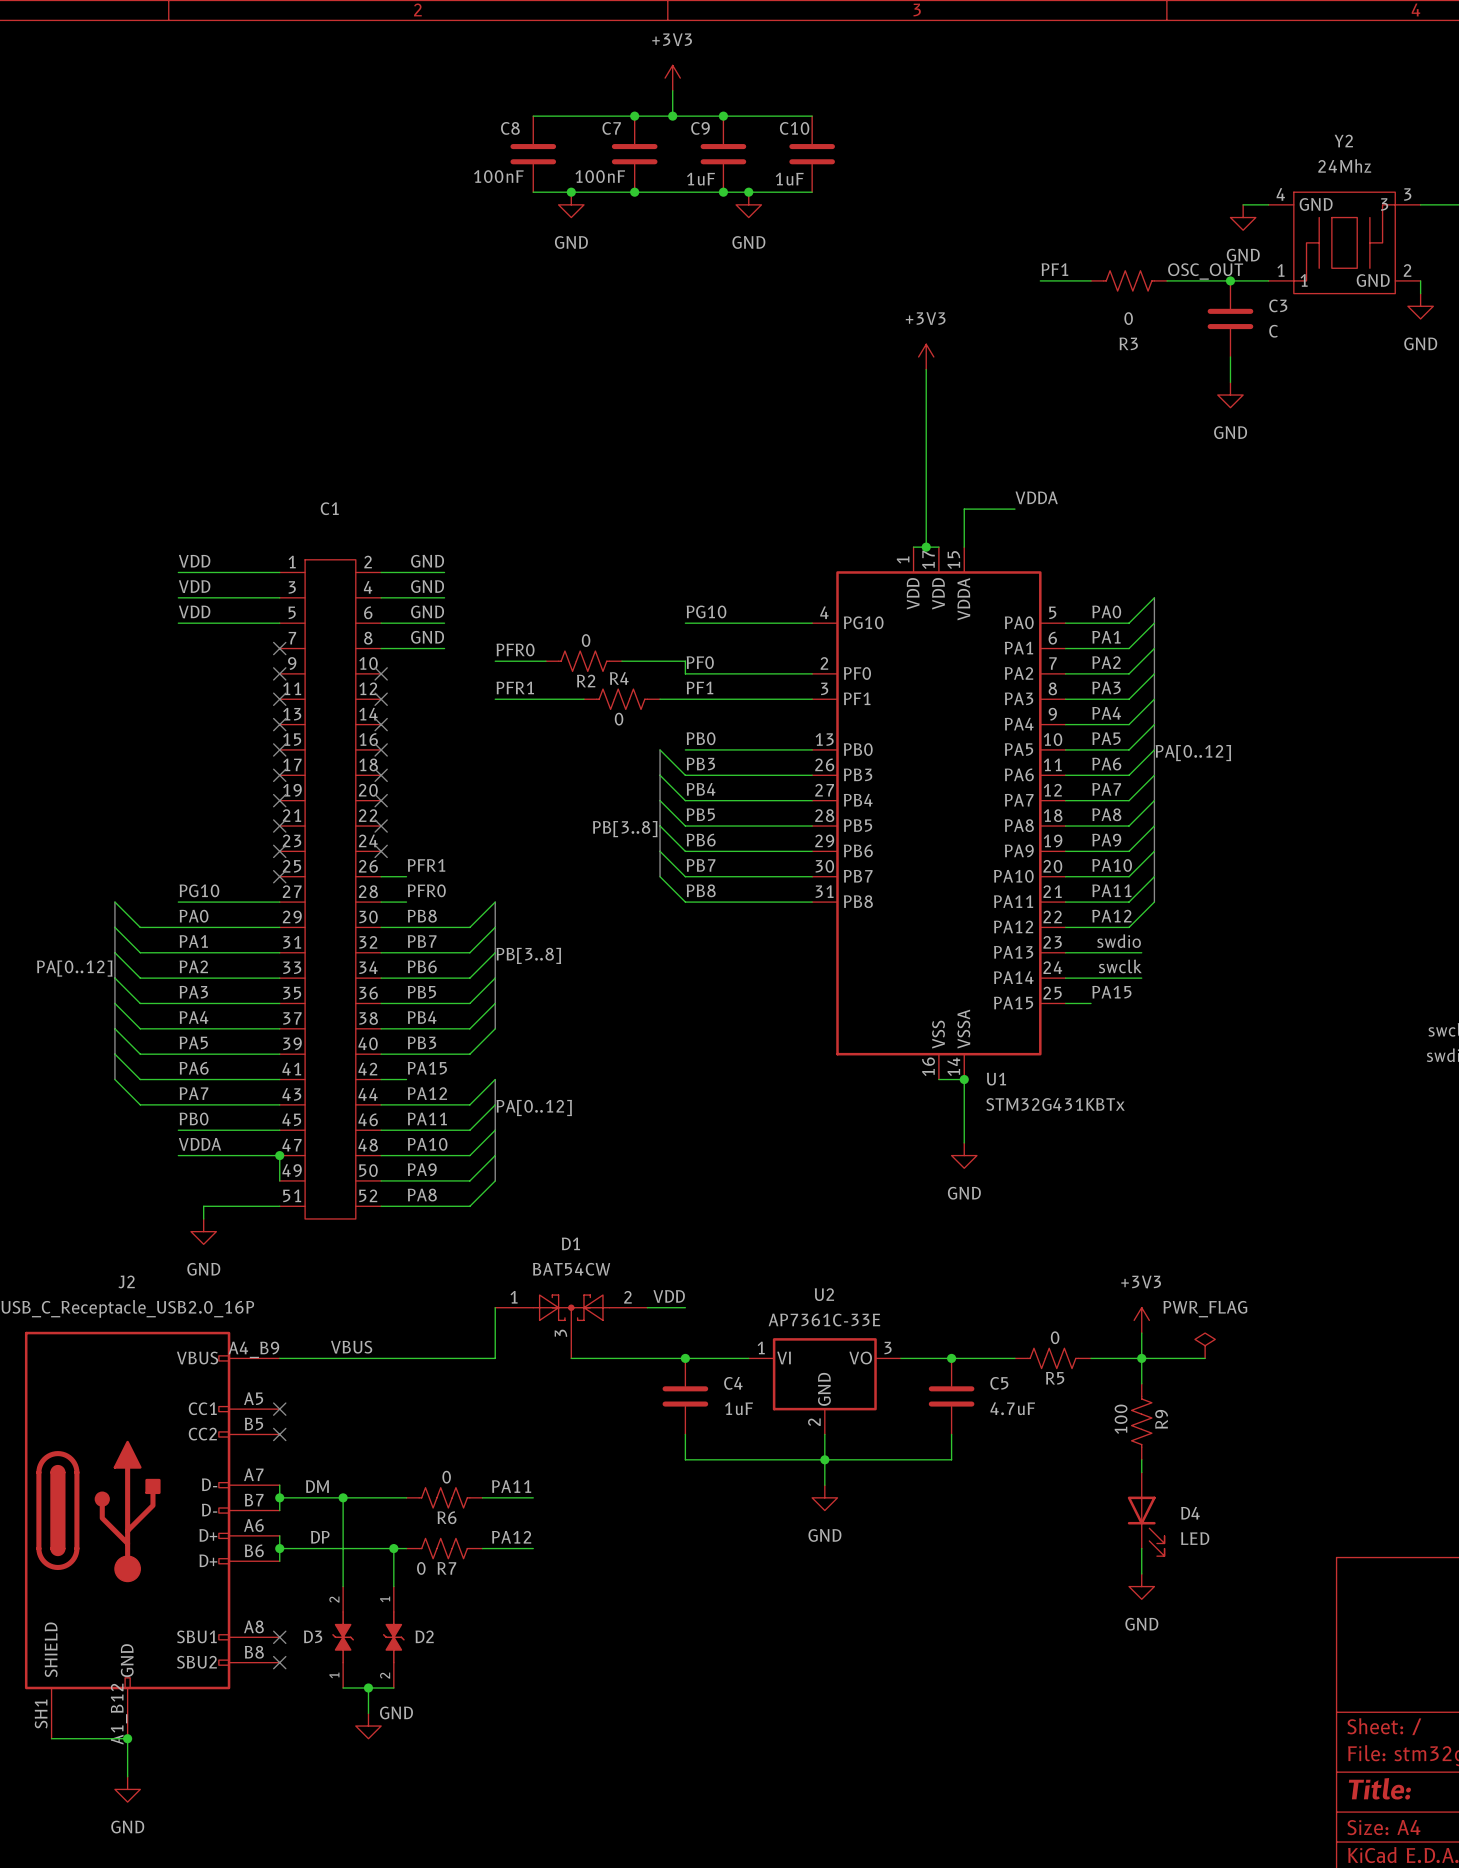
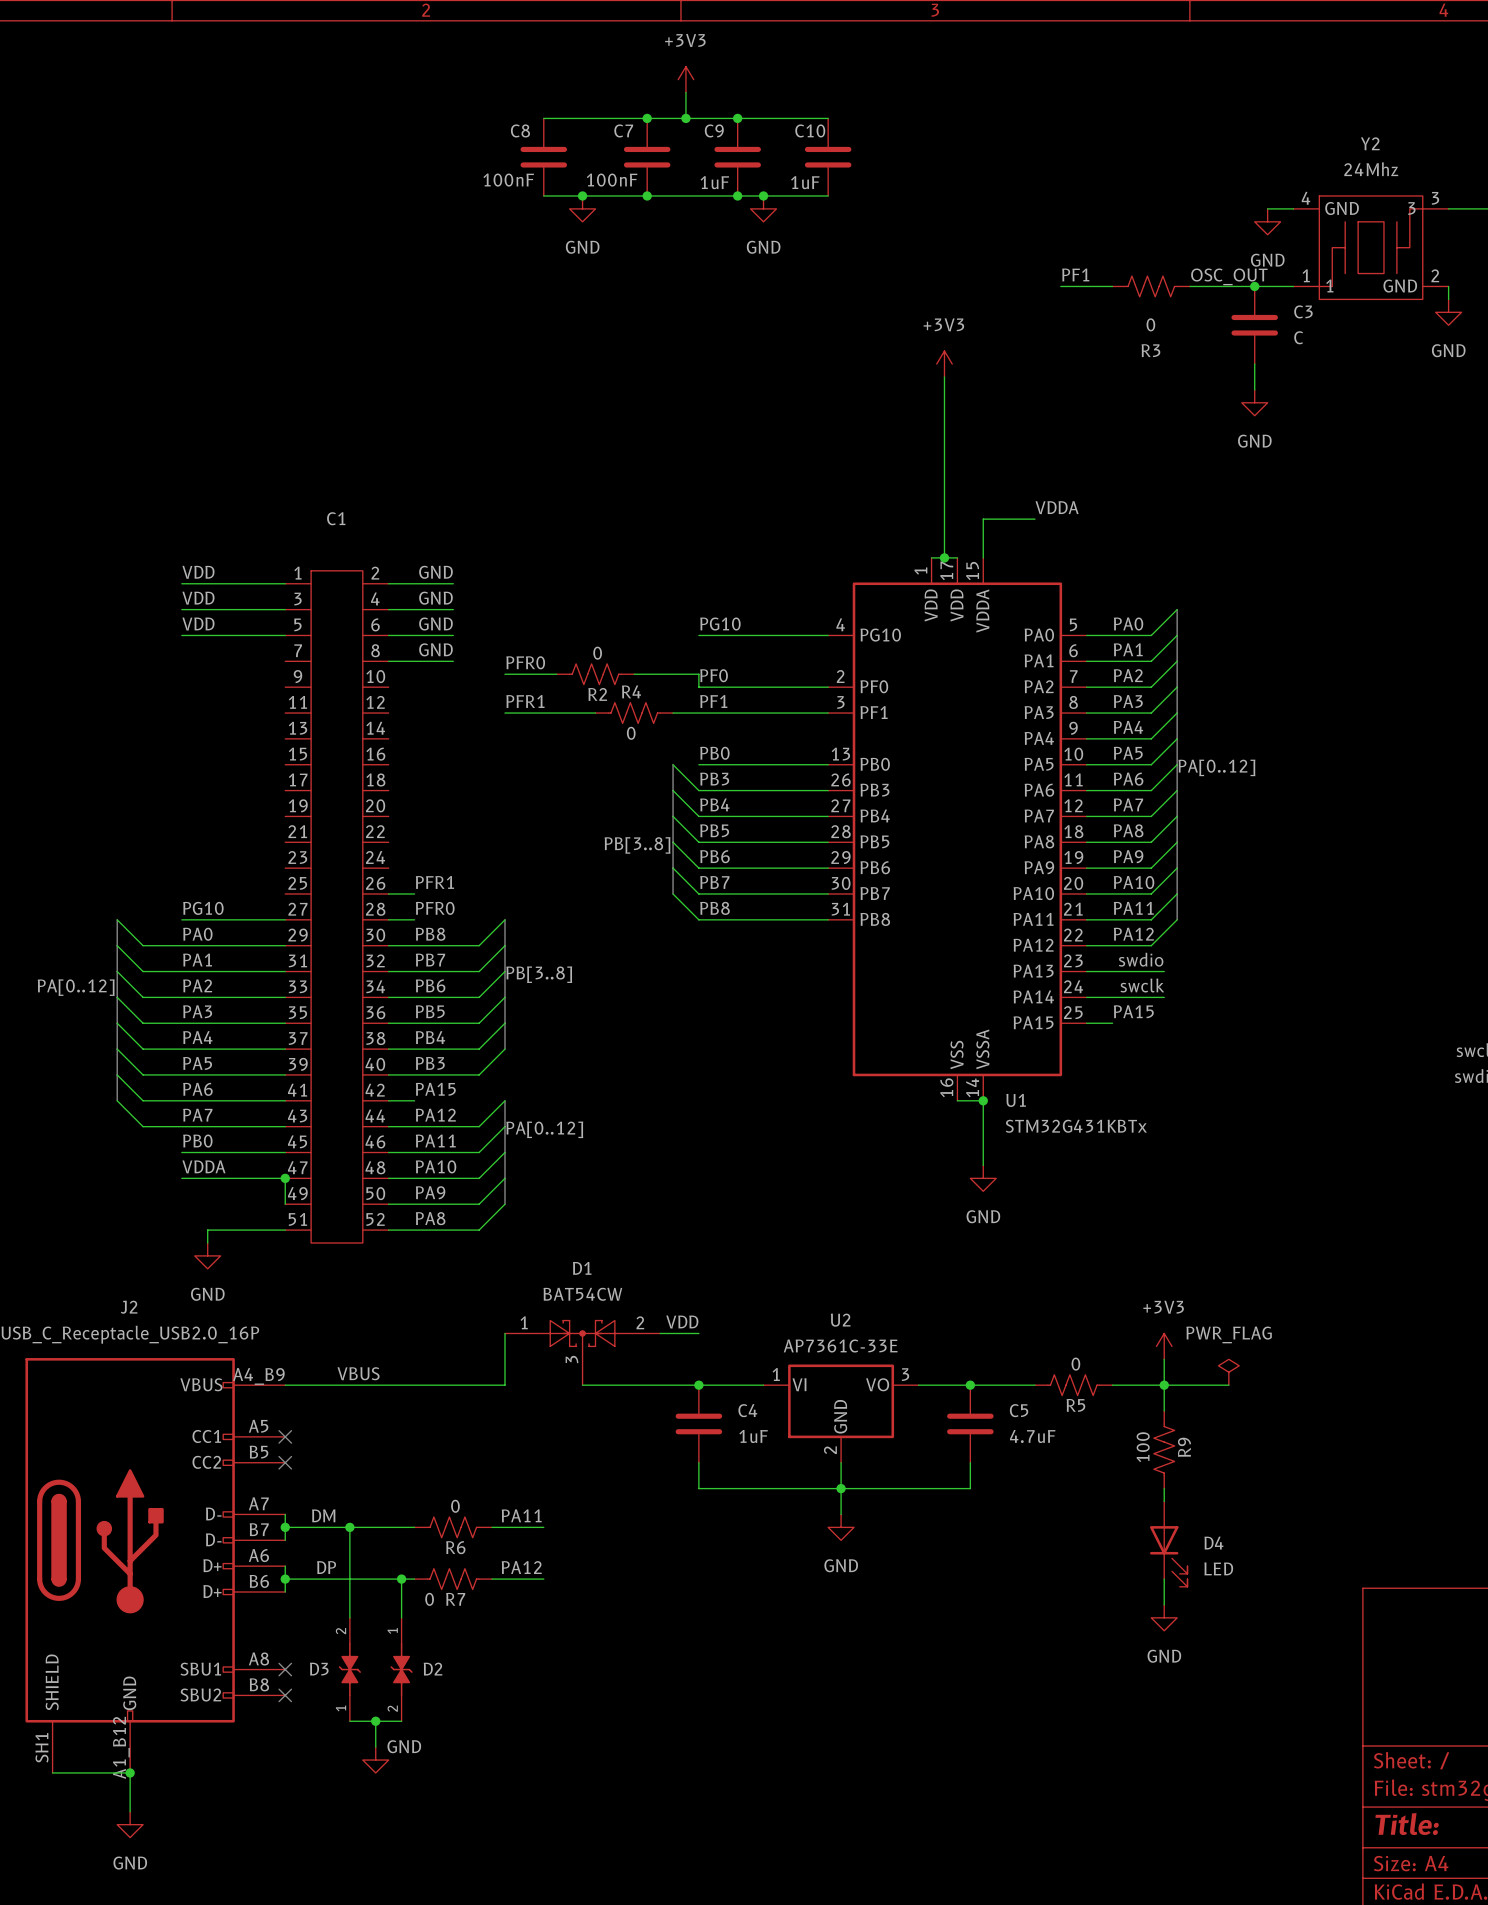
no-connect mark: (279, 648) -> none
no-connect mark: (279, 673) -> none
no-connect mark: (381, 673) -> none
no-connect mark: (279, 699) -> none
no-connect mark: (381, 699) -> none
no-connect mark: (279, 724) -> none
no-connect mark: (381, 724) -> none
no-connect mark: (279, 749) -> none
no-connect mark: (381, 749) -> none
no-connect mark: (279, 775) -> none
no-connect mark: (381, 775) -> none
no-connect mark: (279, 800) -> none
no-connect mark: (381, 800) -> none
no-connect mark: (279, 826) -> none
no-connect mark: (381, 826) -> none
no-connect mark: (279, 851) -> none
no-connect mark: (381, 851) -> none
no-connect mark: (279, 876) -> none

